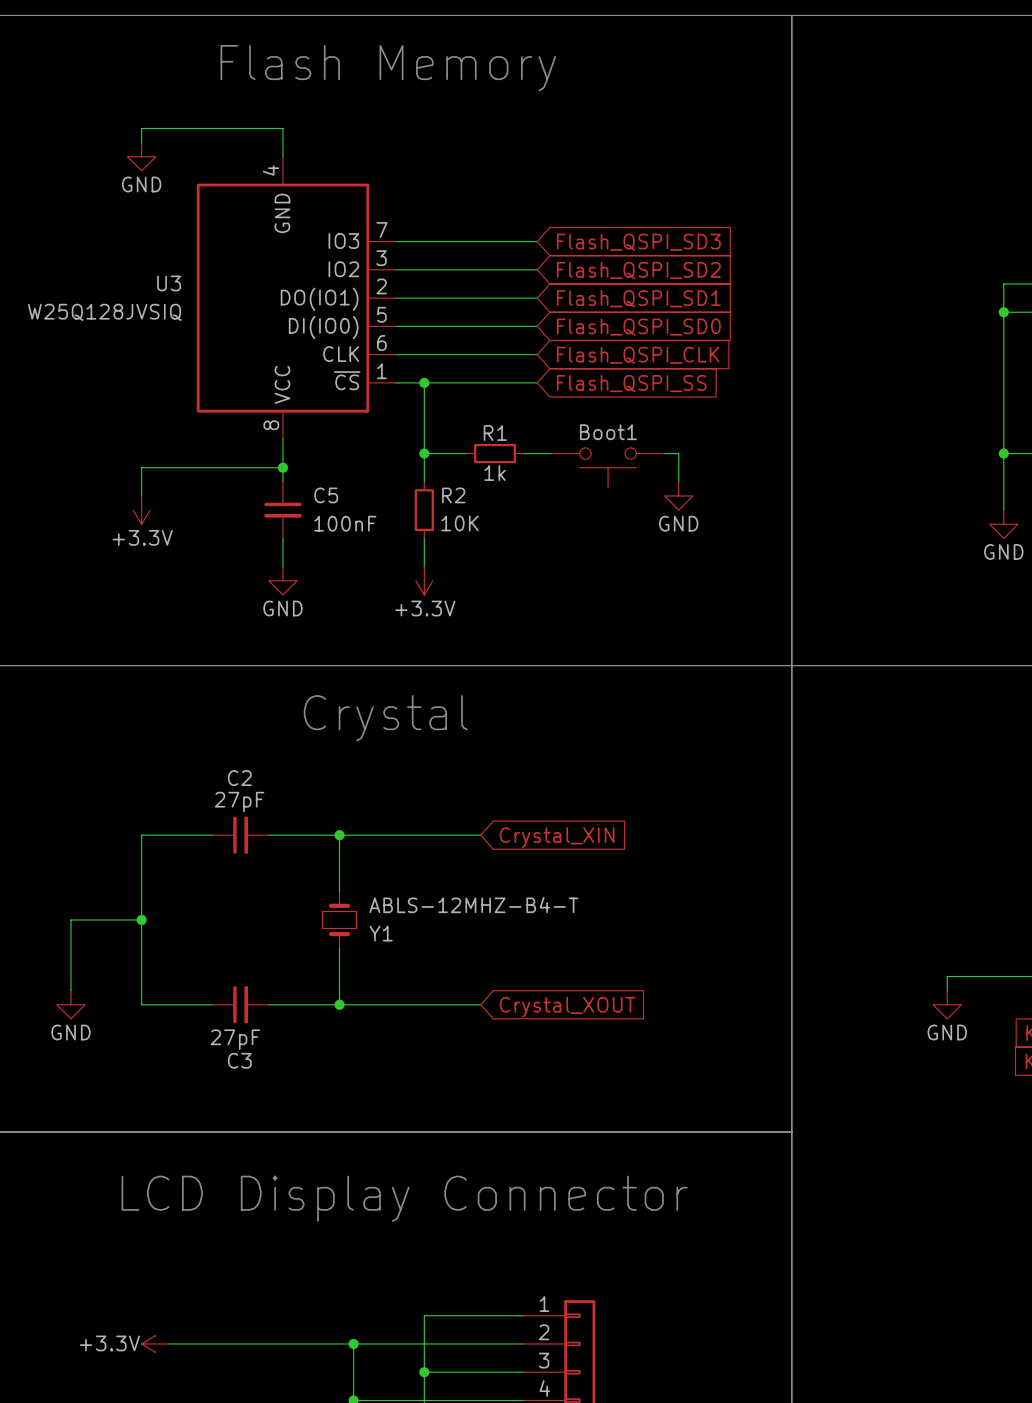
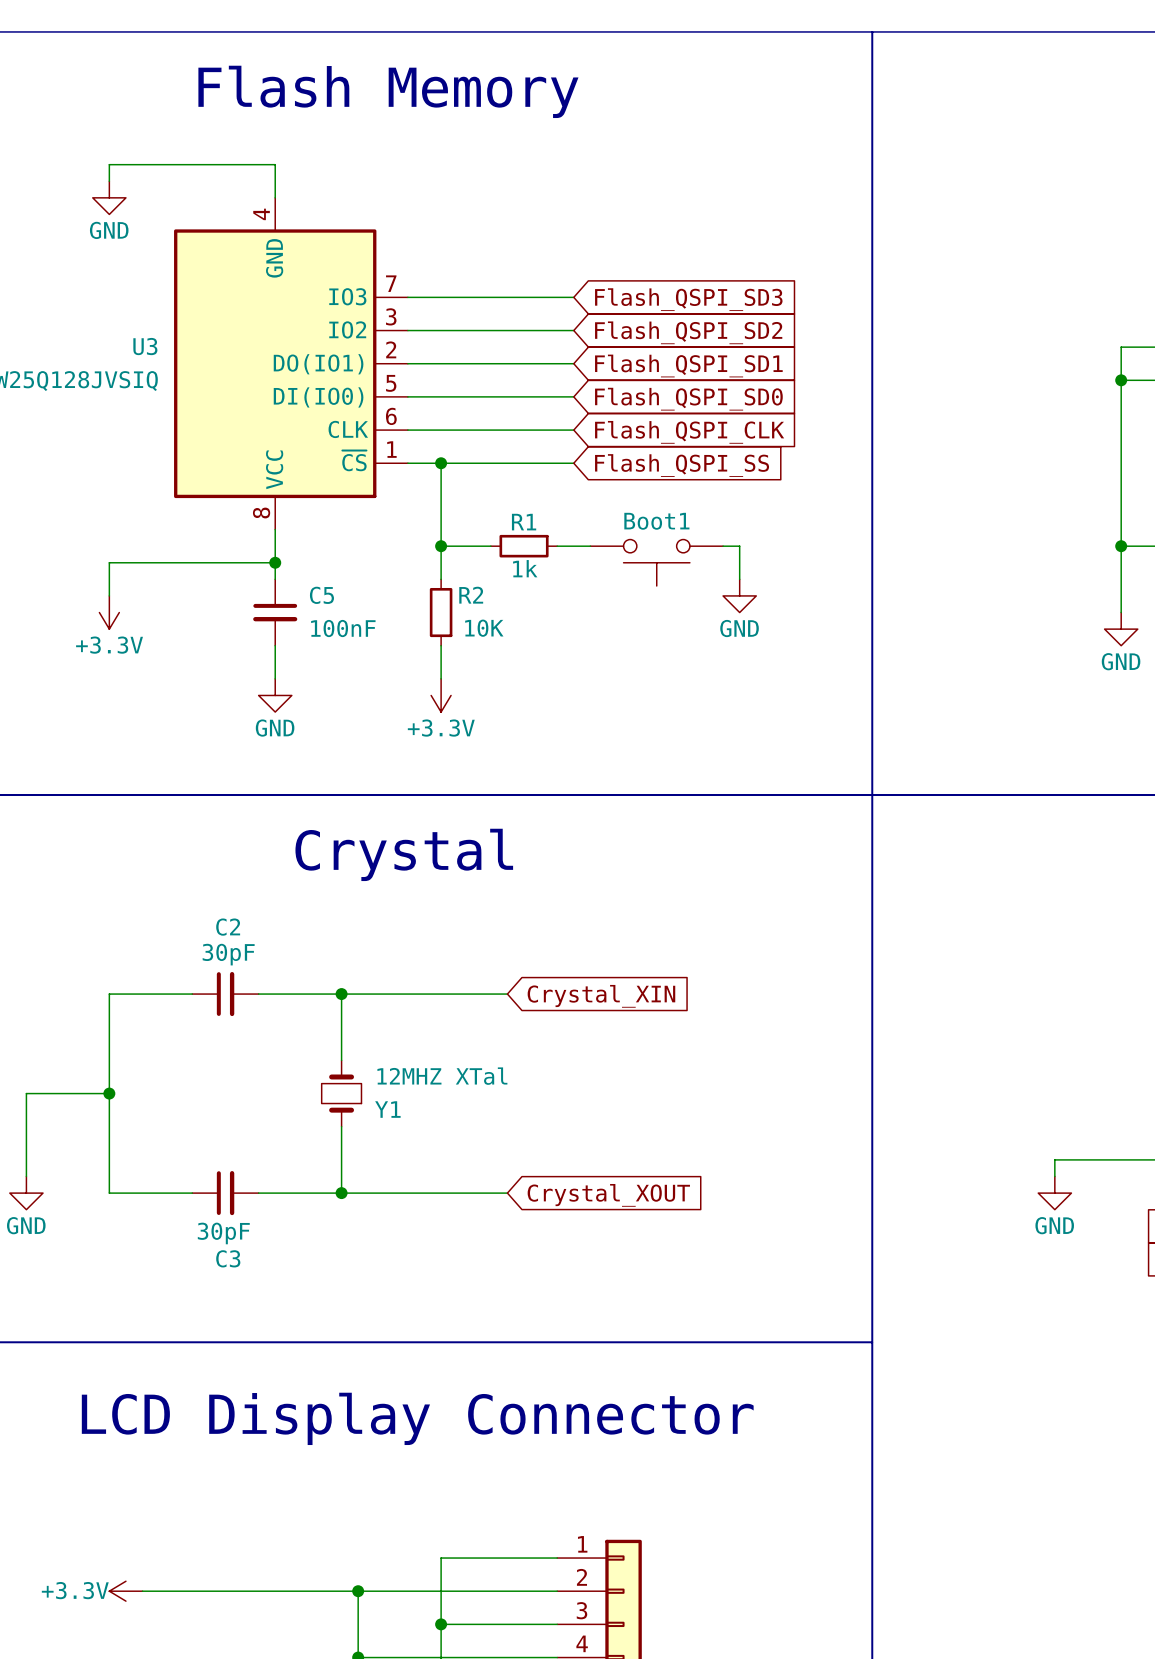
C2 value: 27pF (239, 802) -> 30pF (228, 954)
Y1 value: ABLS-12MHZ-B4-T (473, 904) -> 12MHZ XTal (442, 1076)
C3 value: 27pF (235, 1039) -> 30pF (223, 1233)

